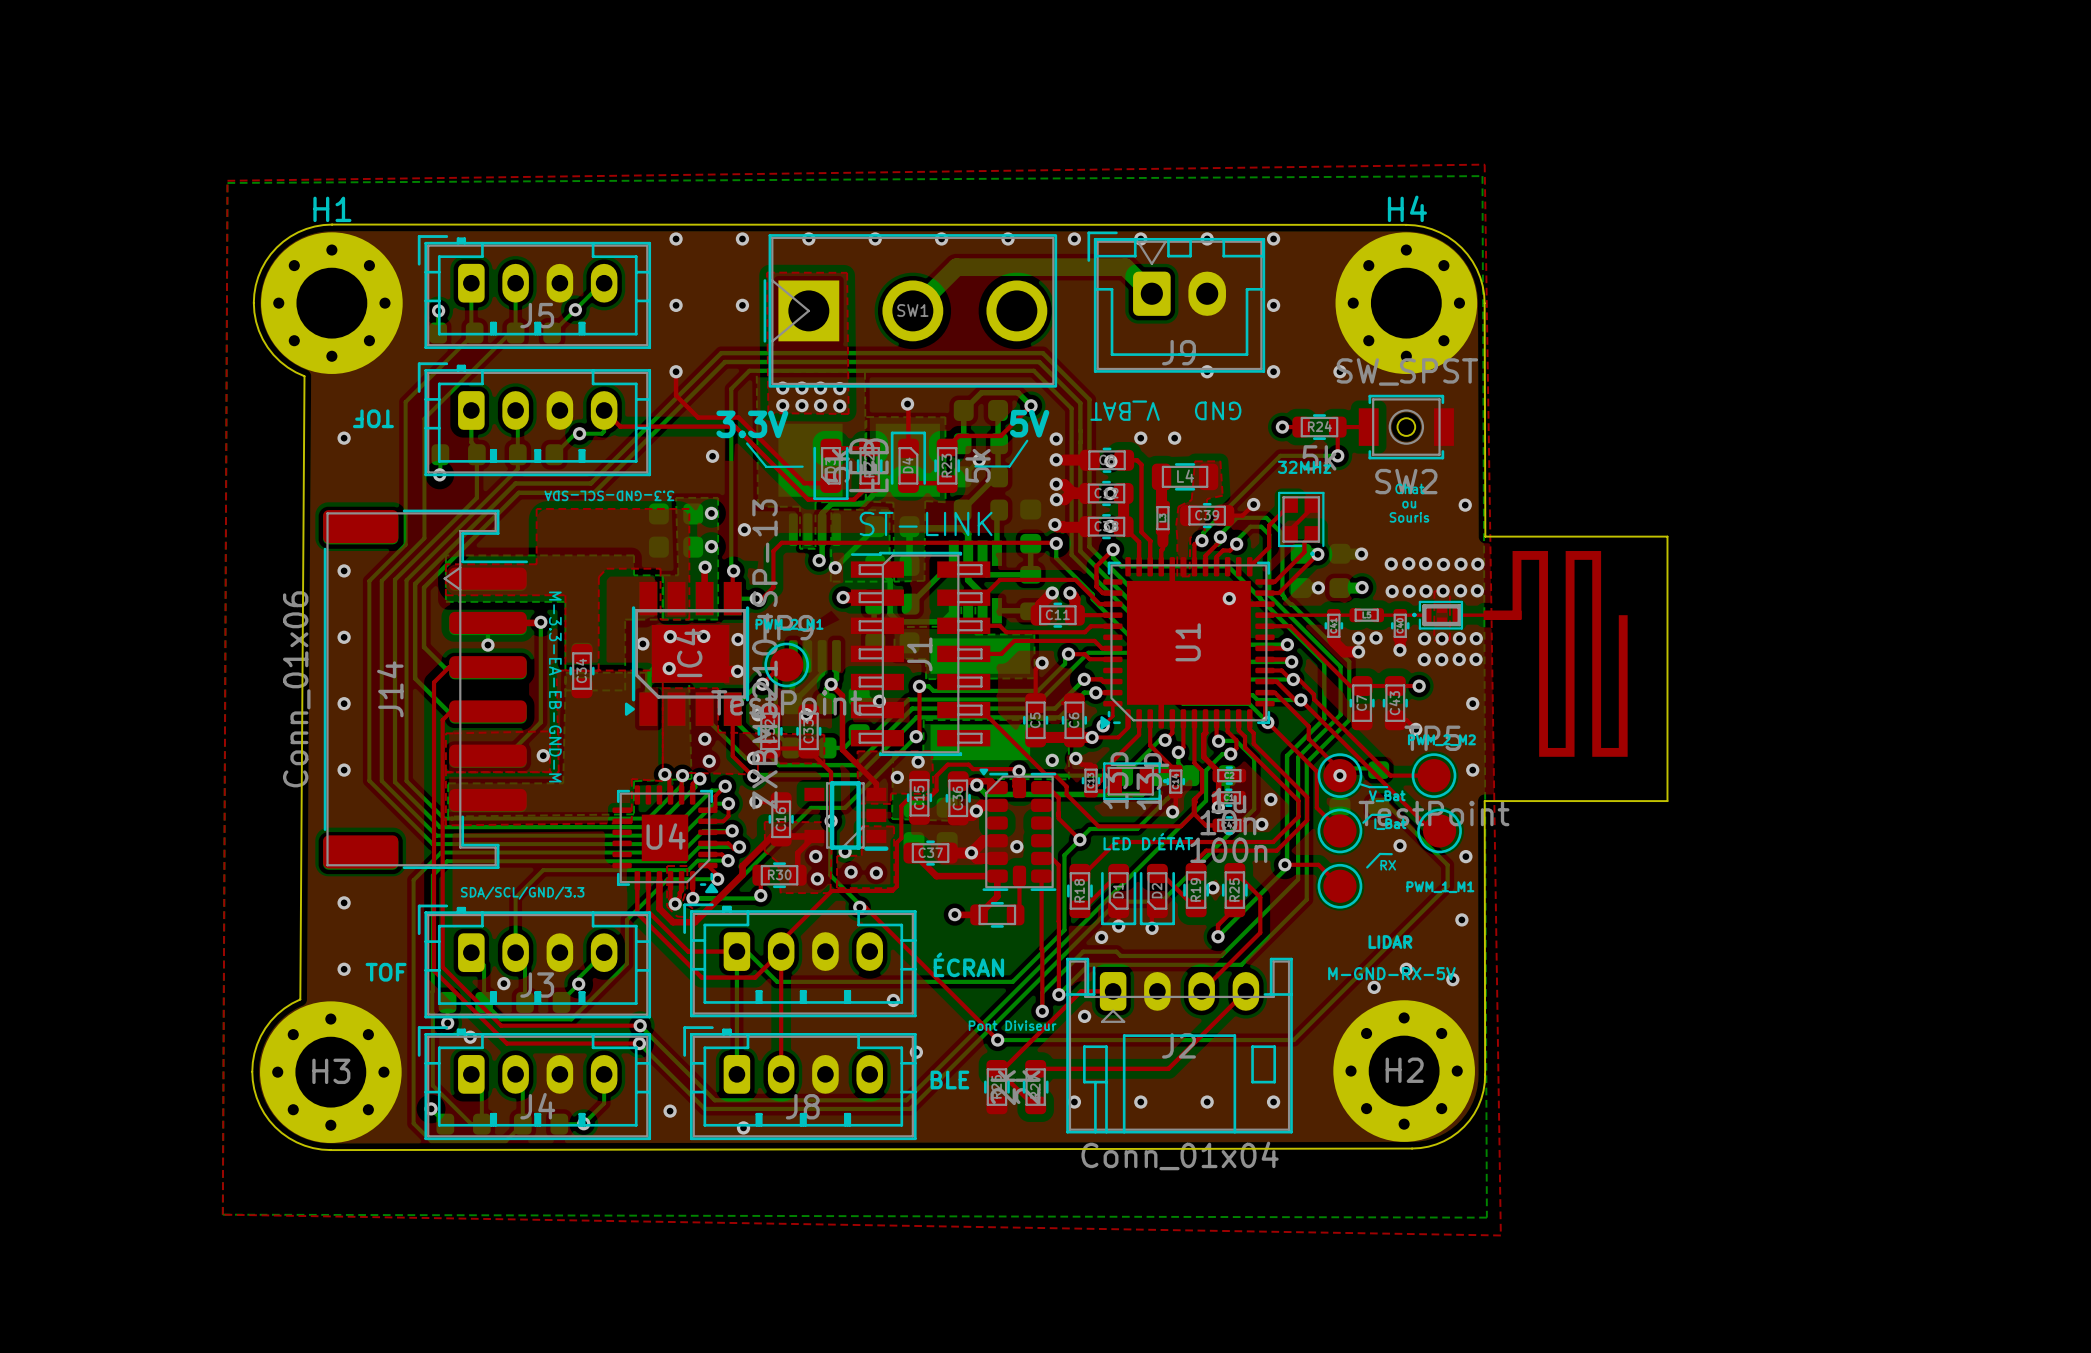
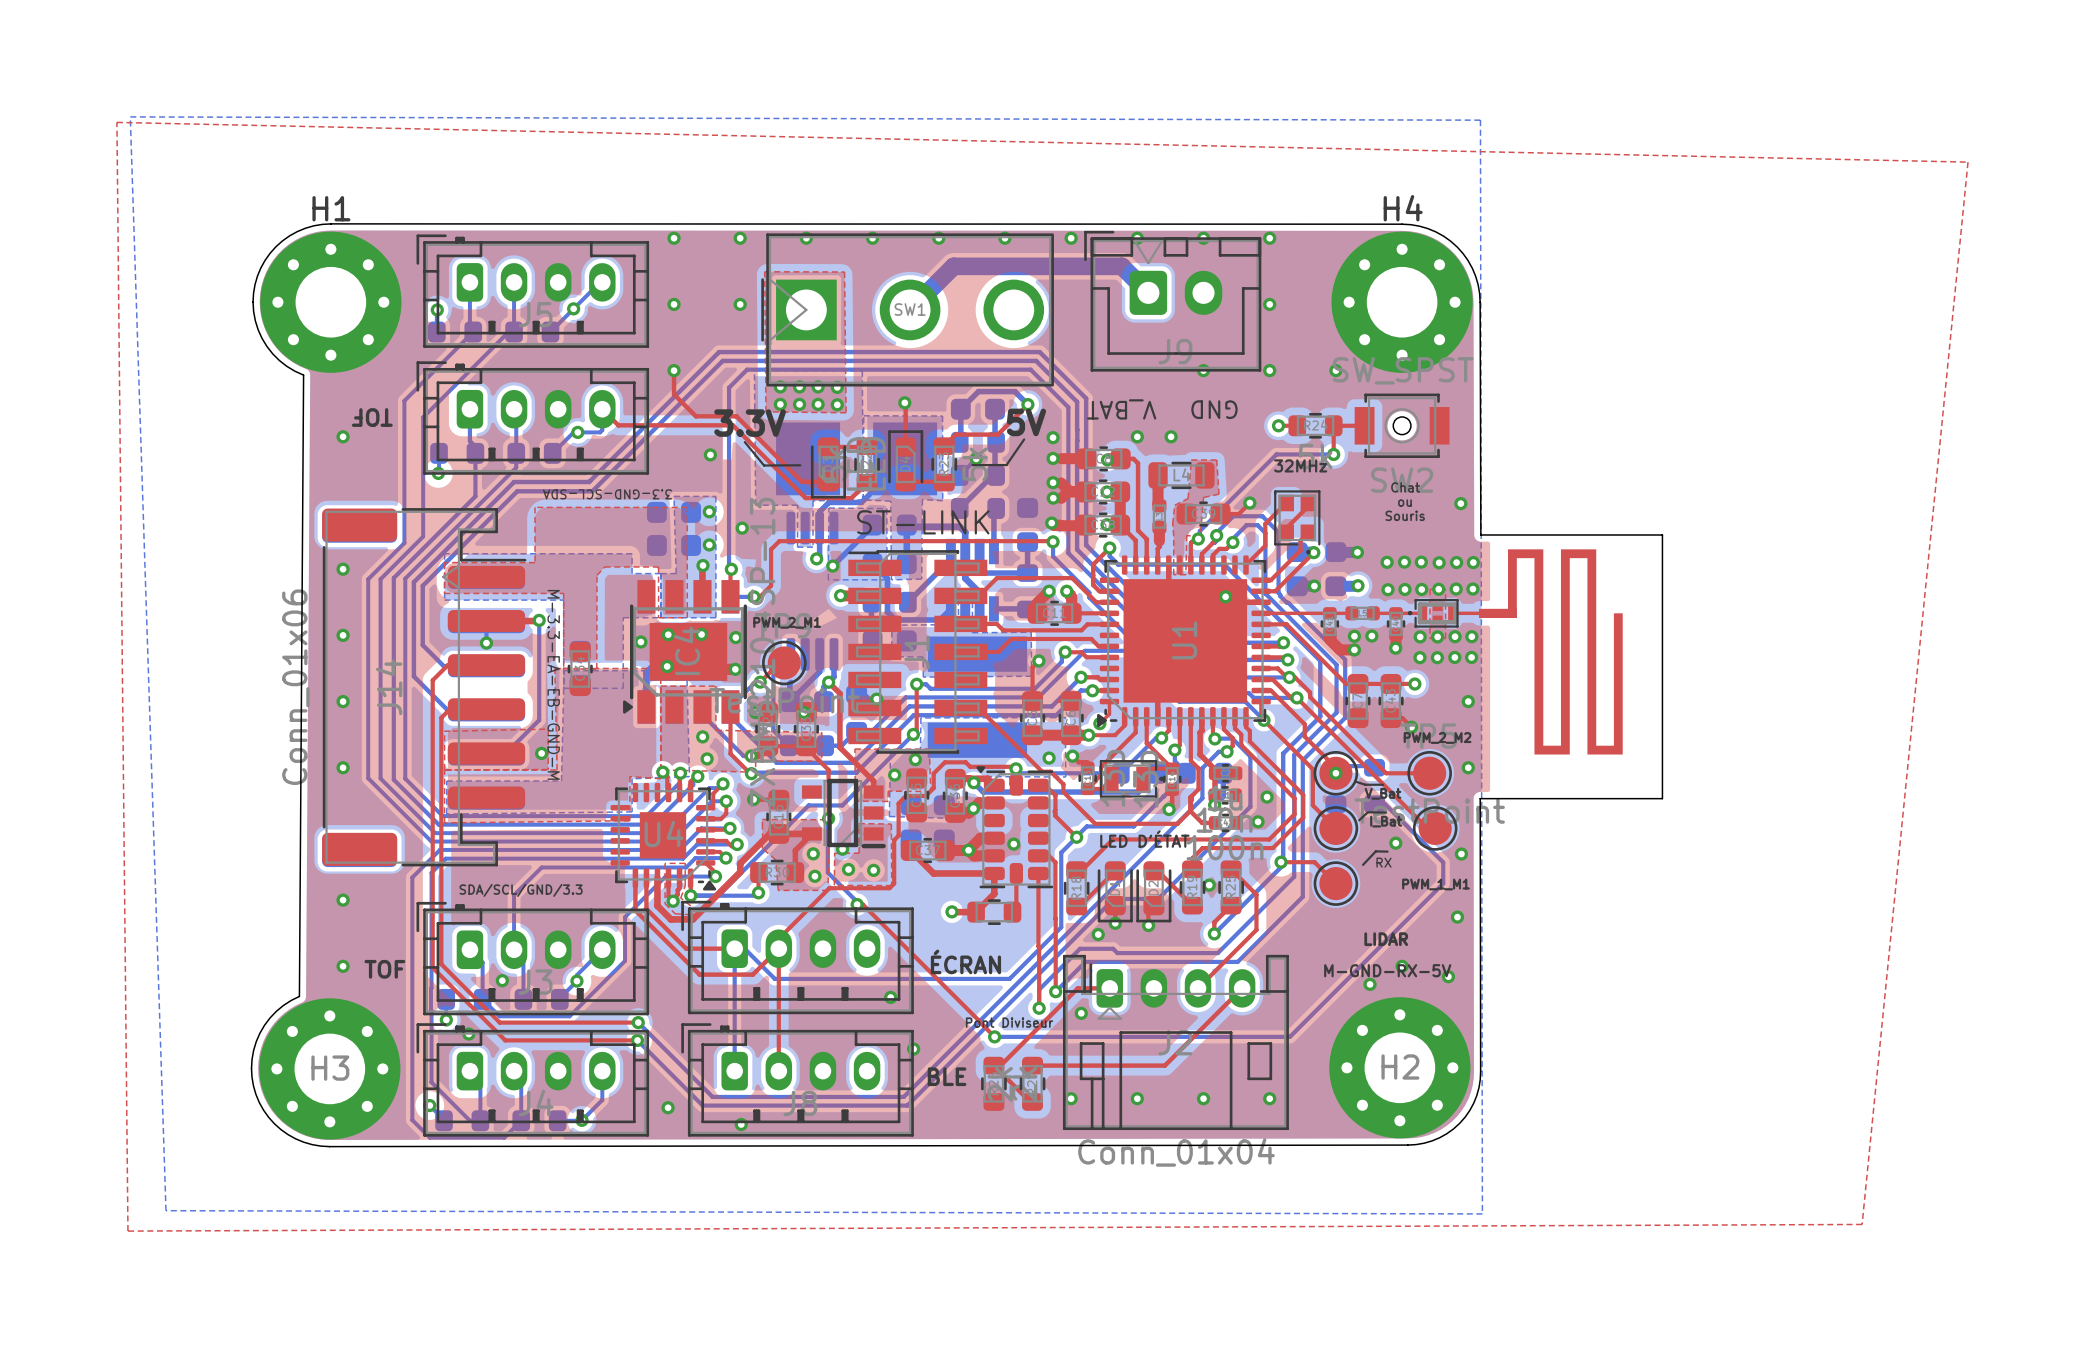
top zone outline: (1484, 164) (227, 180) (222, 1214) (1500, 1235) (1484, 164) -> (116, 122) (127, 1231) (1862, 1224) (1968, 162) (116, 122)
bottom zone outline: (1482, 176) (227, 182) (222, 1214) (1486, 1217) (1482, 176) -> (130, 116) (165, 1210) (1482, 1213) (1480, 120) (130, 116)

